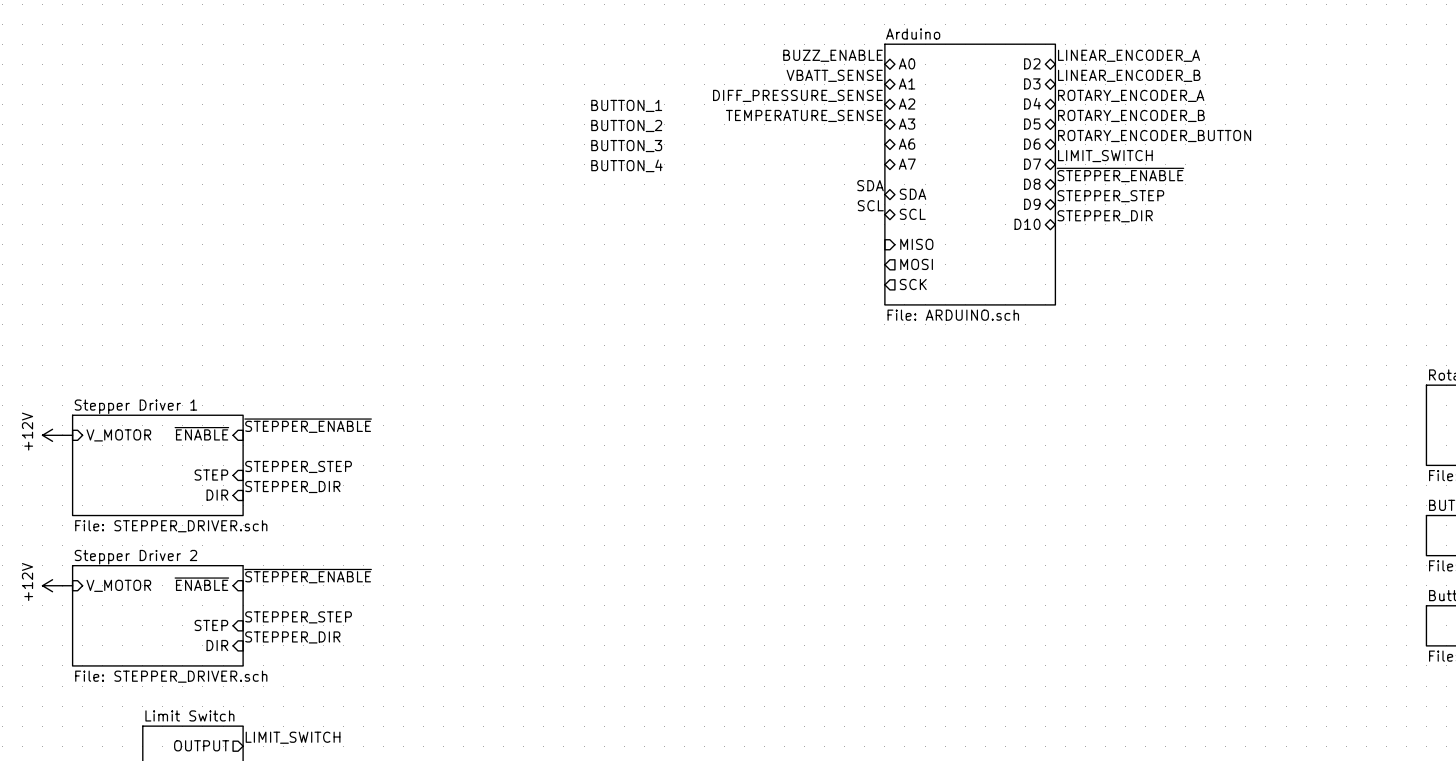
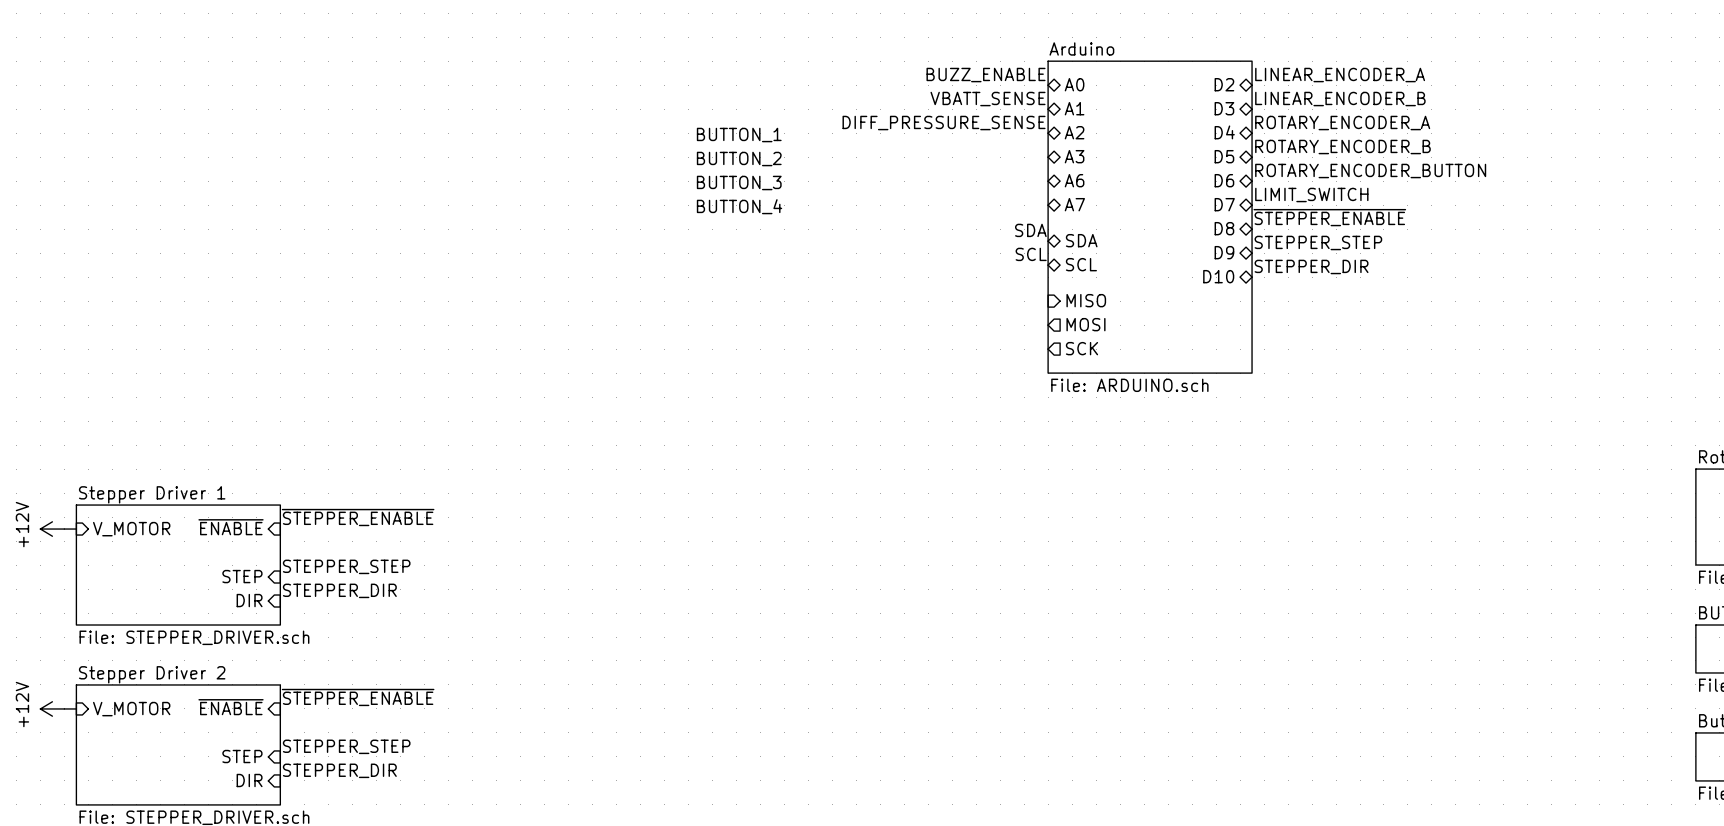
label: TEMPERATURE_SENSE (804, 115) -> none

